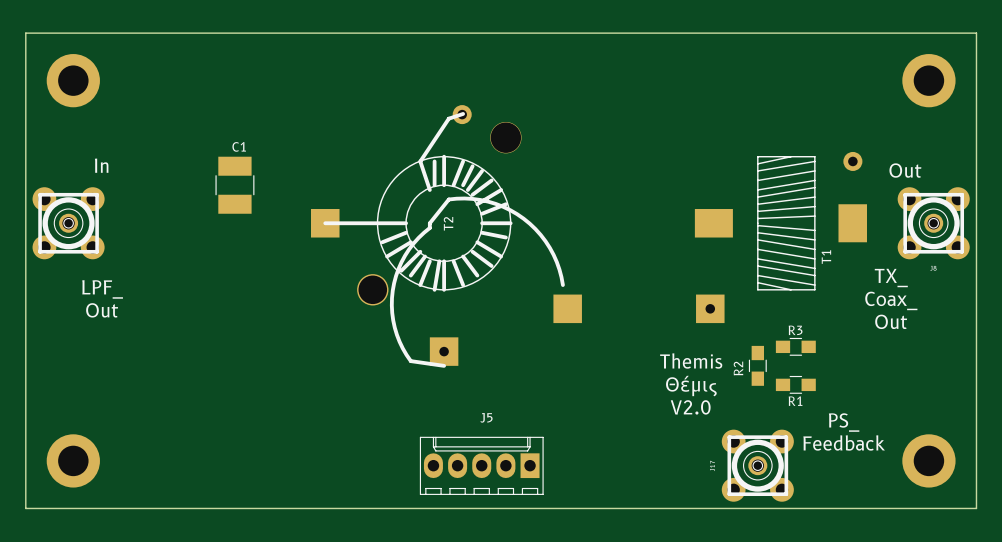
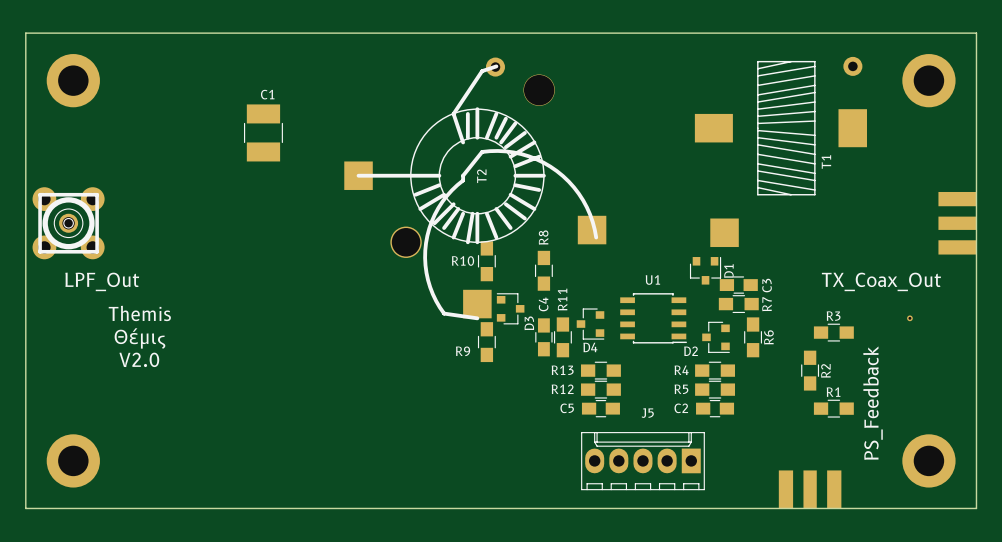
T2 footprint: [311, 105, 582, 368] -> [344, 57, 607, 321]
part position: (505, 137) -> (539, 90)
T1 footprint: [694, 151, 868, 324] -> [694, 56, 868, 248]
text: In (101, 165) -> none
text: Out (905, 170) -> none
C1 position: (234, 185) -> (263, 132)
part: (933, 223) -> none
part: none -> (957, 223)
R10: none -> (486, 261)
R8: none -> (543, 270)
D1: none -> (705, 270)
text: TX_ (891, 277) -> none
C3: none -> (738, 285)
text: LPF_ (102, 289) -> LPF_Out (102, 281)
part position: (372, 289) -> (406, 242)
text: Coax_ (891, 300) -> TX_Coax_Out (881, 281)
R7: none -> (738, 304)
D3: none -> (510, 308)
text: Out (102, 310) -> none
text: none -> Themis (139, 313)
U1: none -> (653, 318)
part: none -> (909, 318)
text: Out (891, 321) -> none
D4: none -> (590, 324)
C4: none -> (543, 337)
R11: none -> (562, 337)
D2: none -> (716, 337)
R6: none -> (753, 337)
text: none -> Θέμις (139, 338)
R9: none -> (486, 342)
R3 position: (795, 346) -> (833, 332)
text: none -> V2.0 (139, 359)
text: Themis (691, 360) -> none
R2 position: (757, 365) -> (810, 370)
R2 name position: R2 (738, 368) -> R2 (825, 370)
R13: none -> (600, 370)
R4: none -> (715, 370)
R1 position: (795, 384) -> (833, 408)
text: Θέμις (691, 386) -> none
R12: none -> (600, 389)
R5: none -> (715, 389)
R1 name position: R1 (795, 401) -> R1 (833, 392)
text: V2.0 (690, 407) -> none
C5: none -> (600, 408)
C2: none -> (715, 408)
text: PS_ (844, 422) -> none
text: Feedback (844, 442) -> PS_Feedback (873, 403)
J5 position: (481, 465) -> (642, 461)
part: (757, 465) -> none
part: none -> (810, 489)

